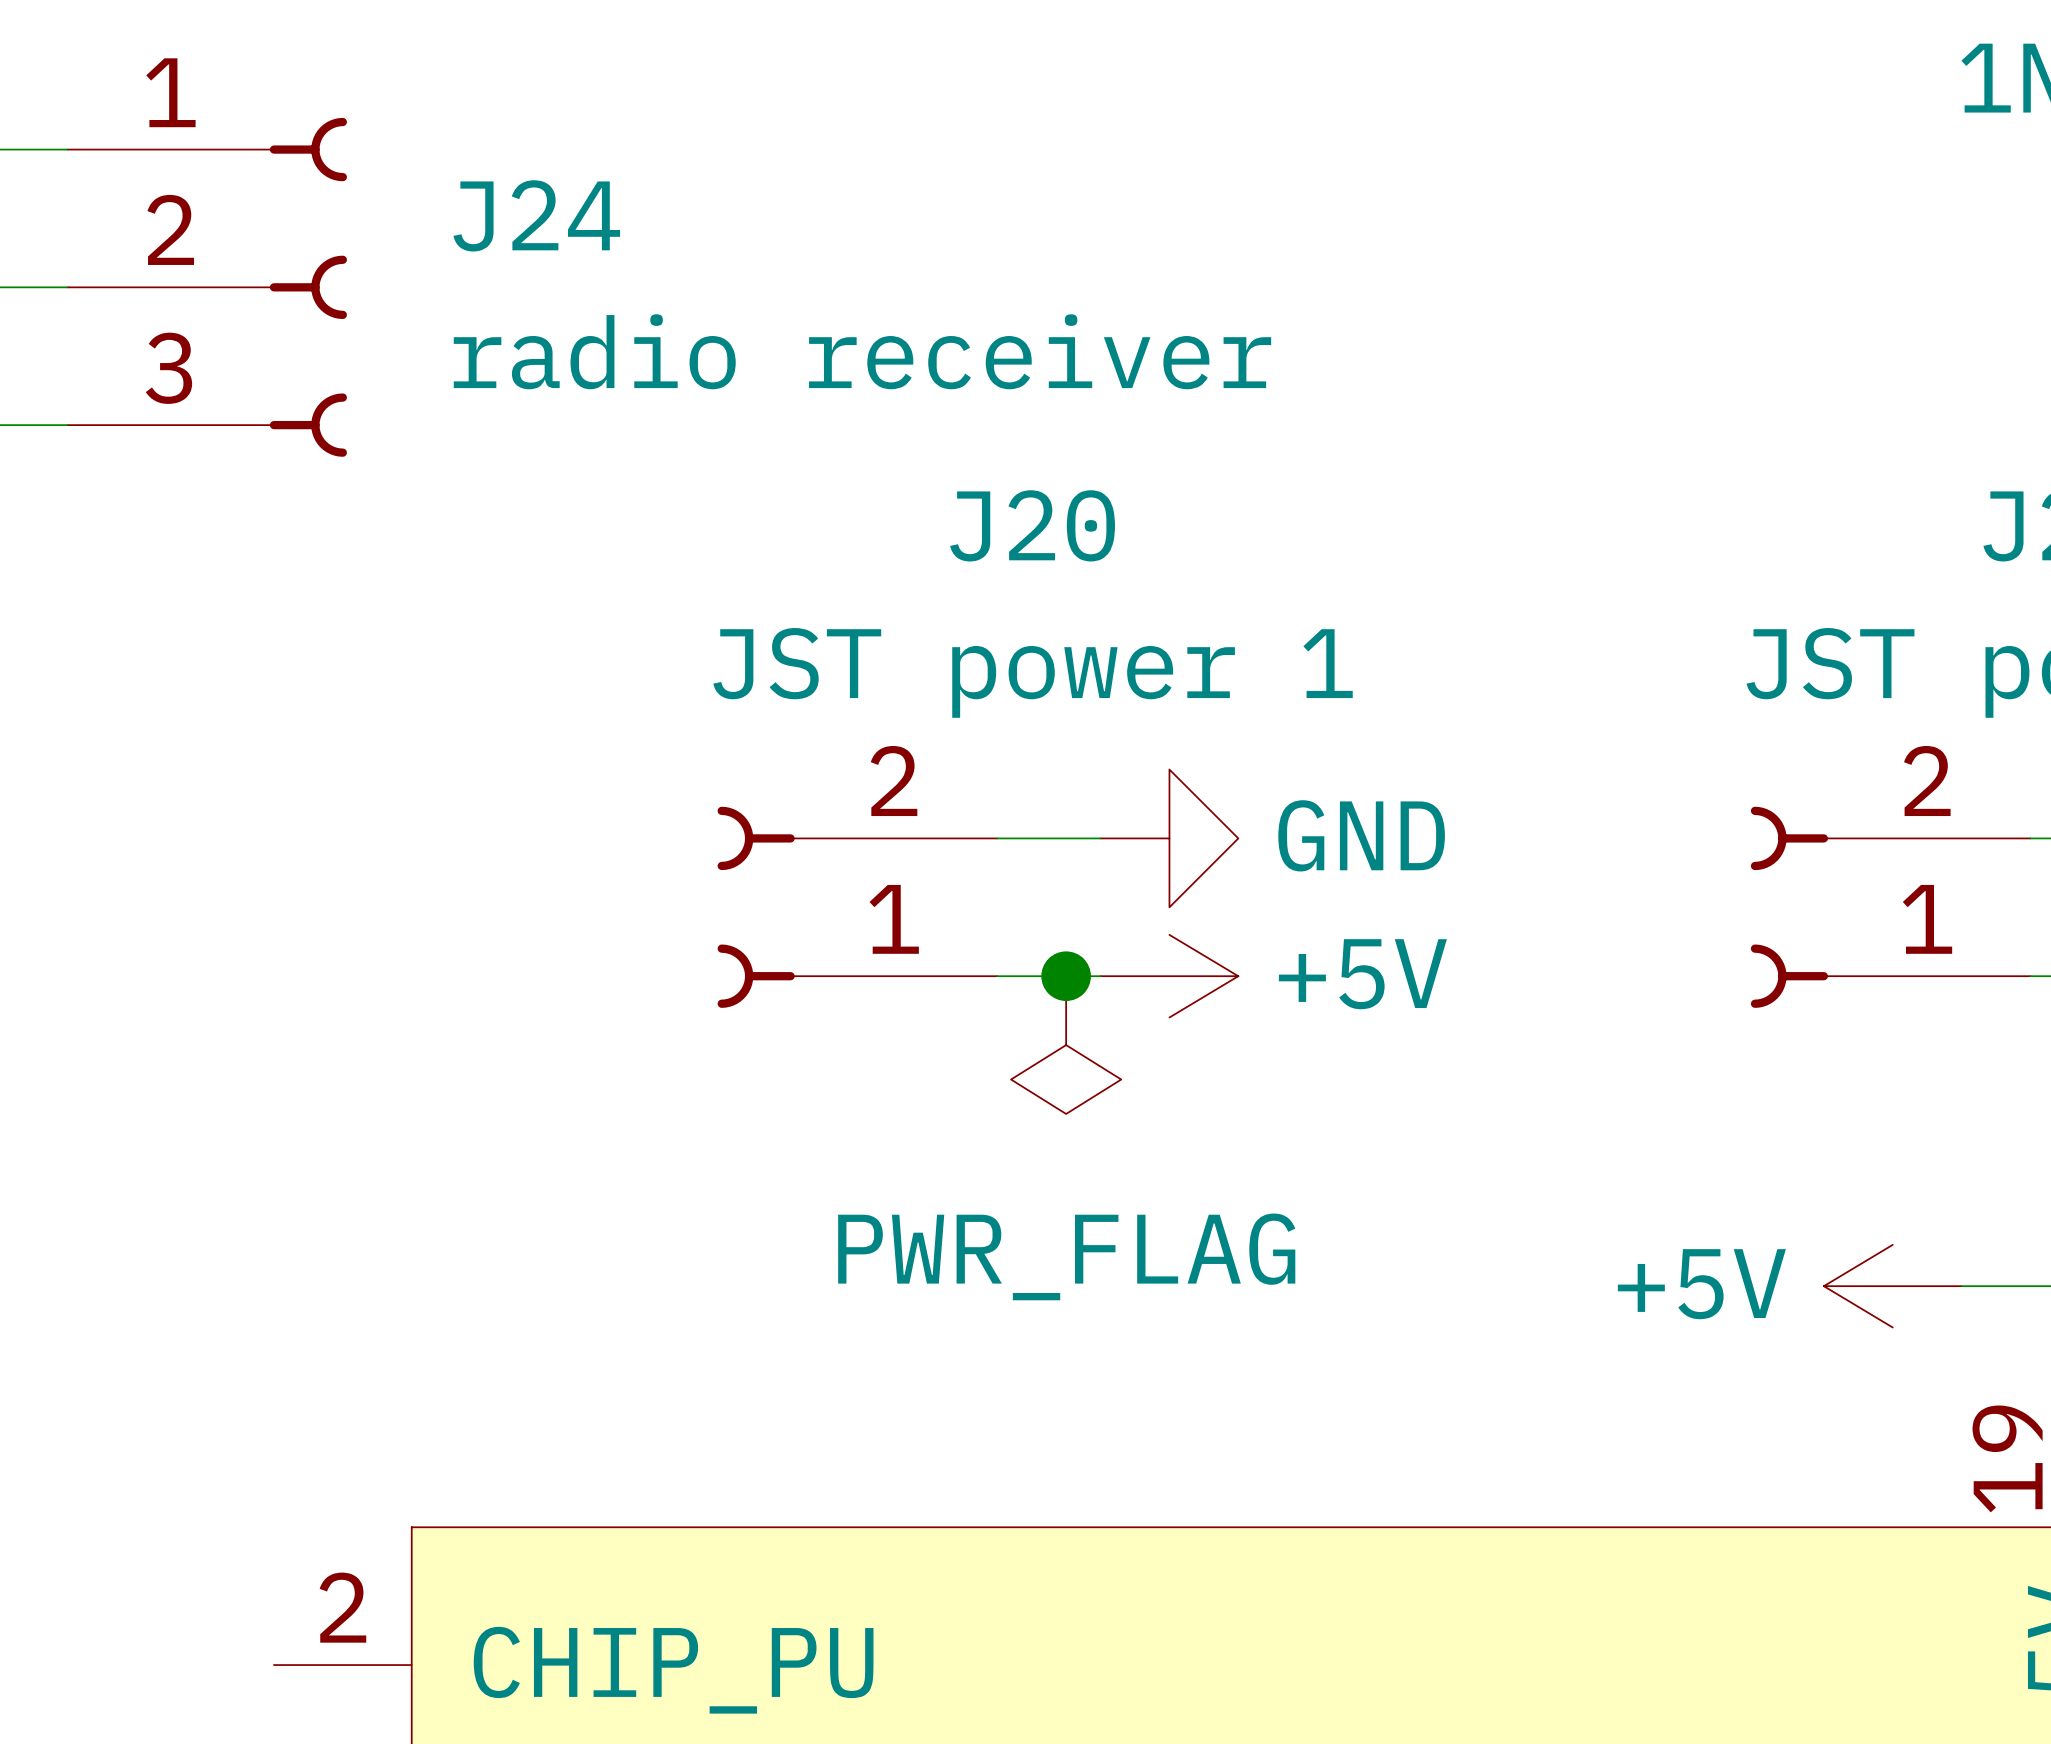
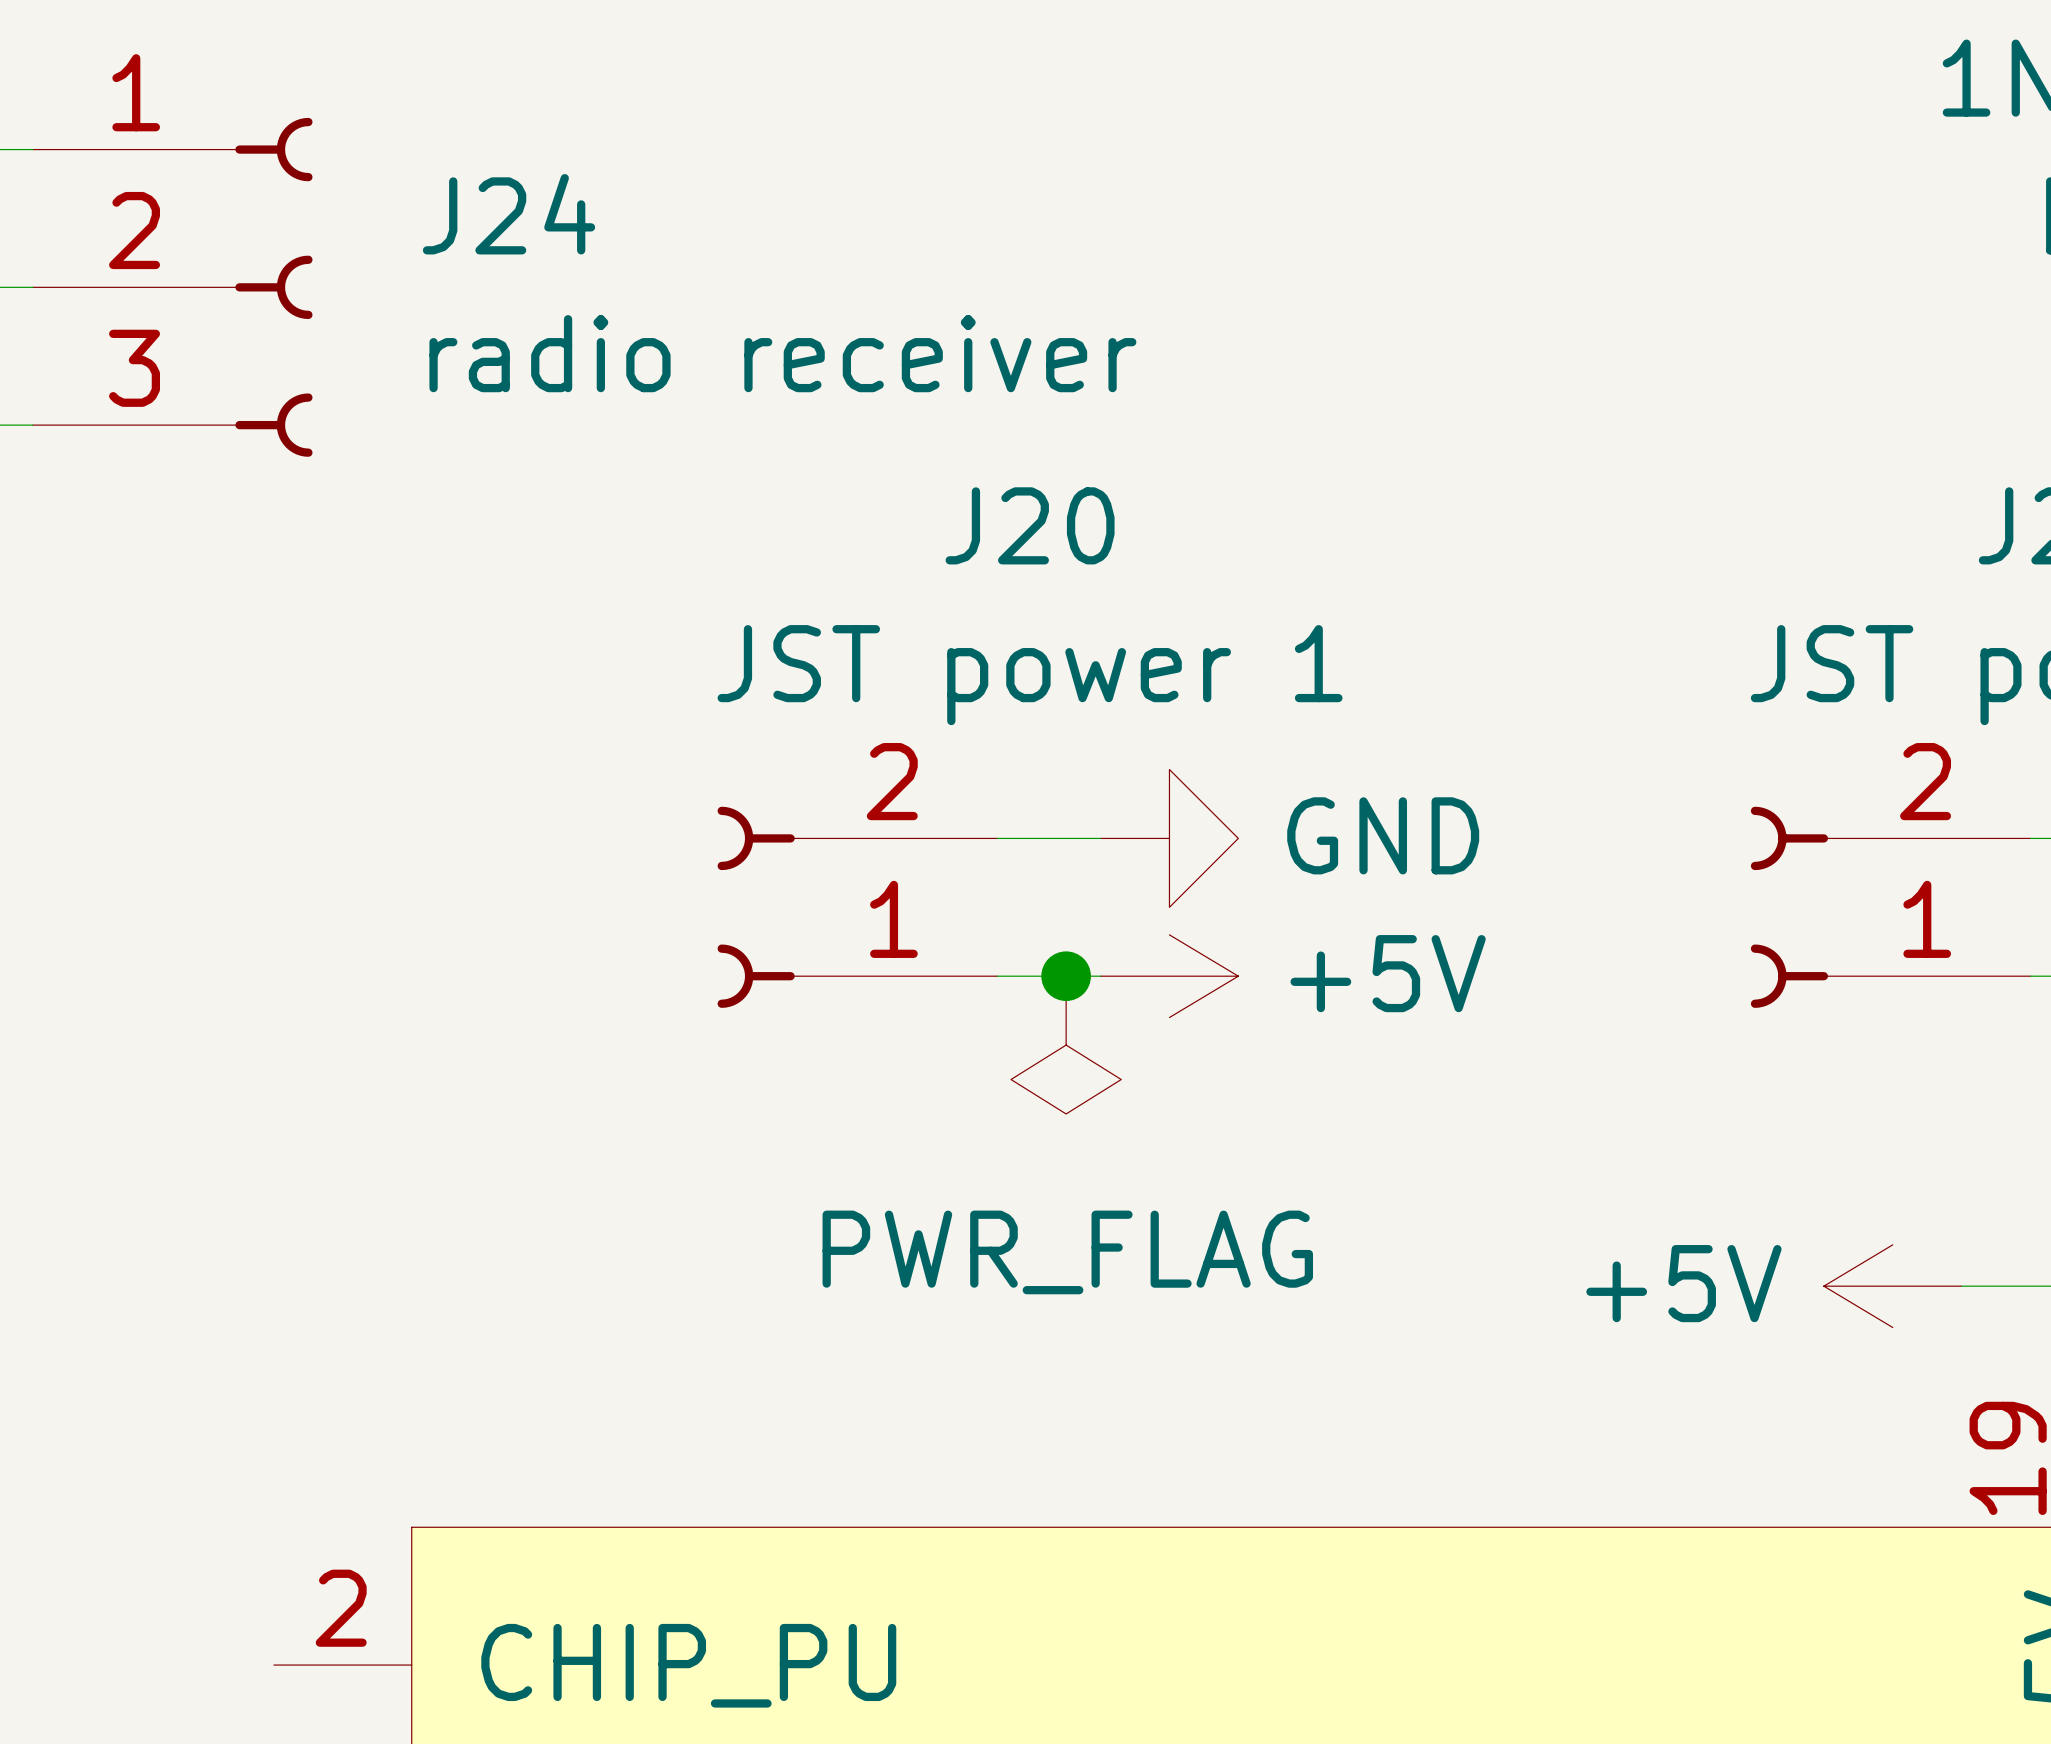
J24 position: (207, 287) -> (172, 287)

